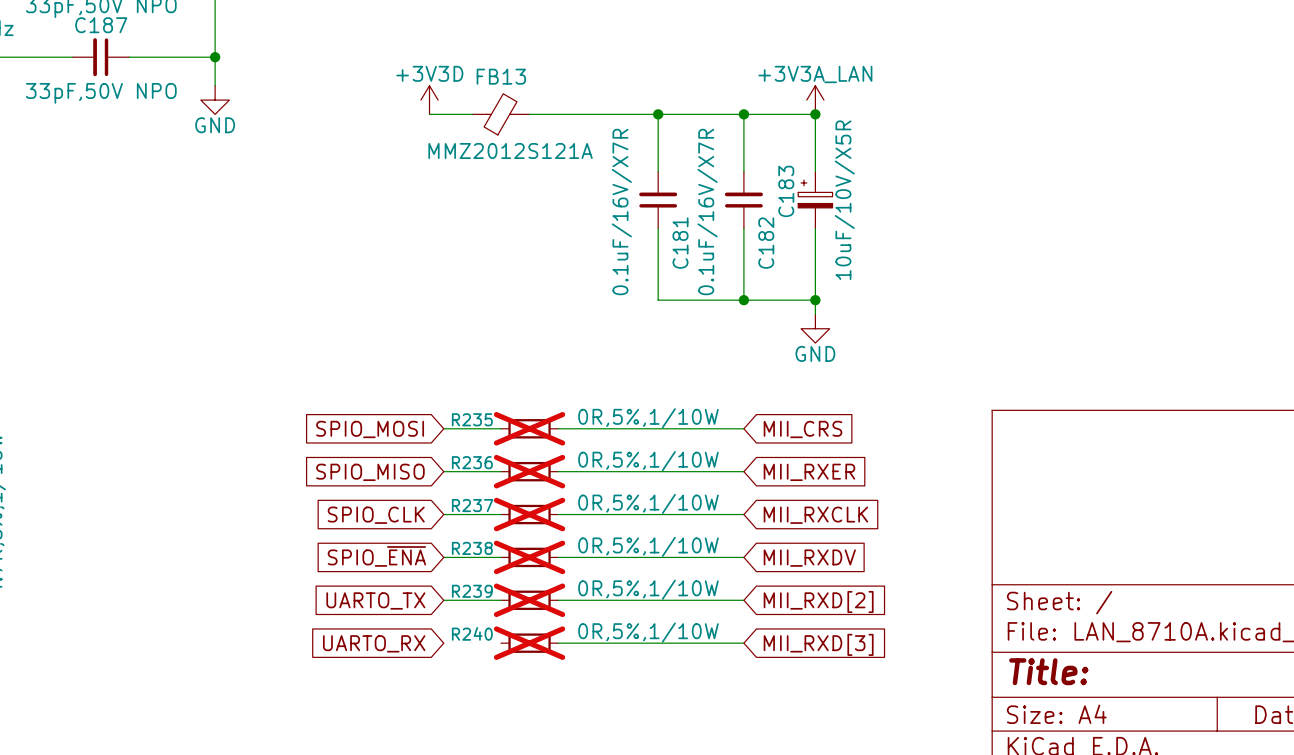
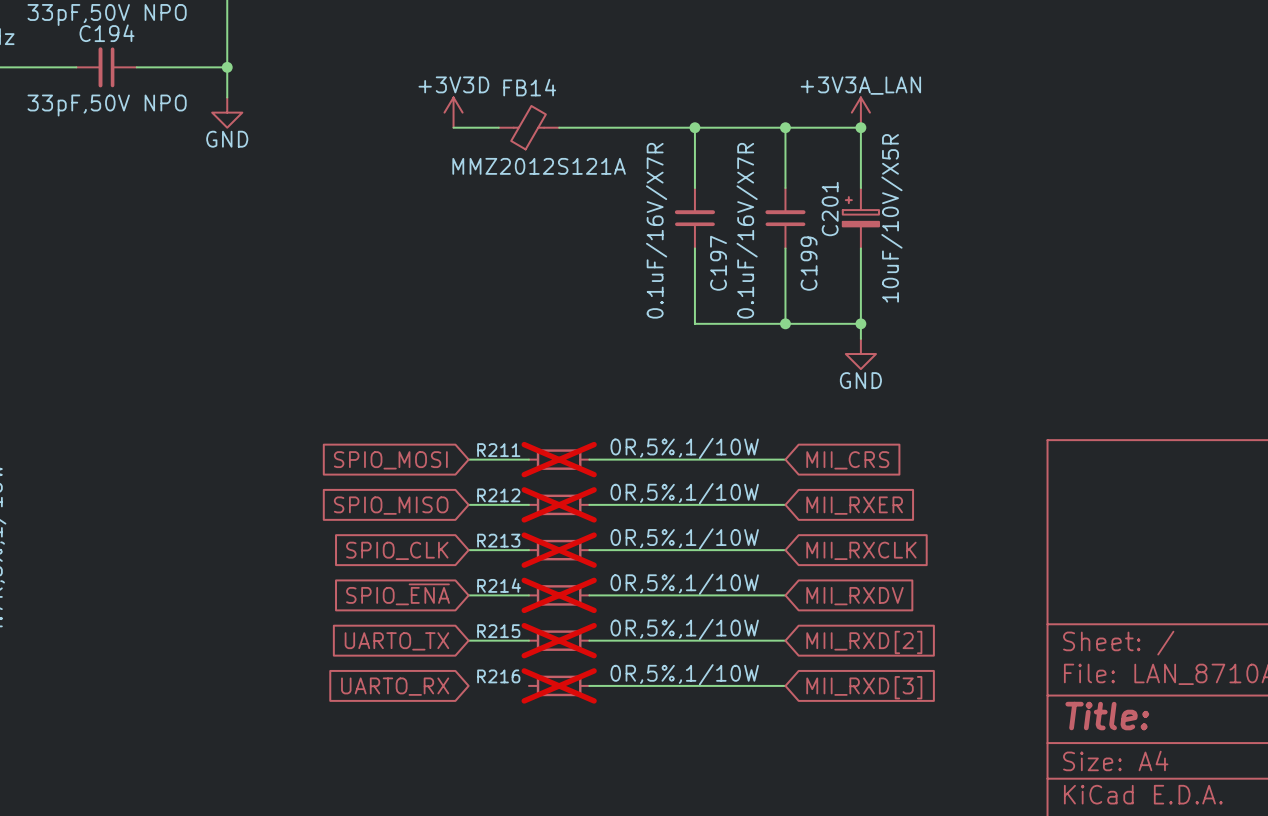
C187 name: C187 (101, 25) -> C194 (107, 33)
FB13 name: FB13 (501, 76) -> FB14 (529, 87)
C183 name: C183 (786, 191) -> C201 (830, 209)
C181 name: C181 (680, 243) -> C197 (718, 263)
C182 name: C182 (766, 243) -> C199 (809, 263)
R235 name: R235 (472, 419) -> R211 (498, 450)
R236 name: R236 (472, 462) -> R212 (498, 495)
R237 name: R237 (472, 505) -> R213 (498, 540)
R238 name: R238 (472, 548) -> R214 (499, 585)
R239 name: R239 (472, 591) -> R215 (498, 631)
R240 name: R240 (472, 633) -> R216 (498, 676)

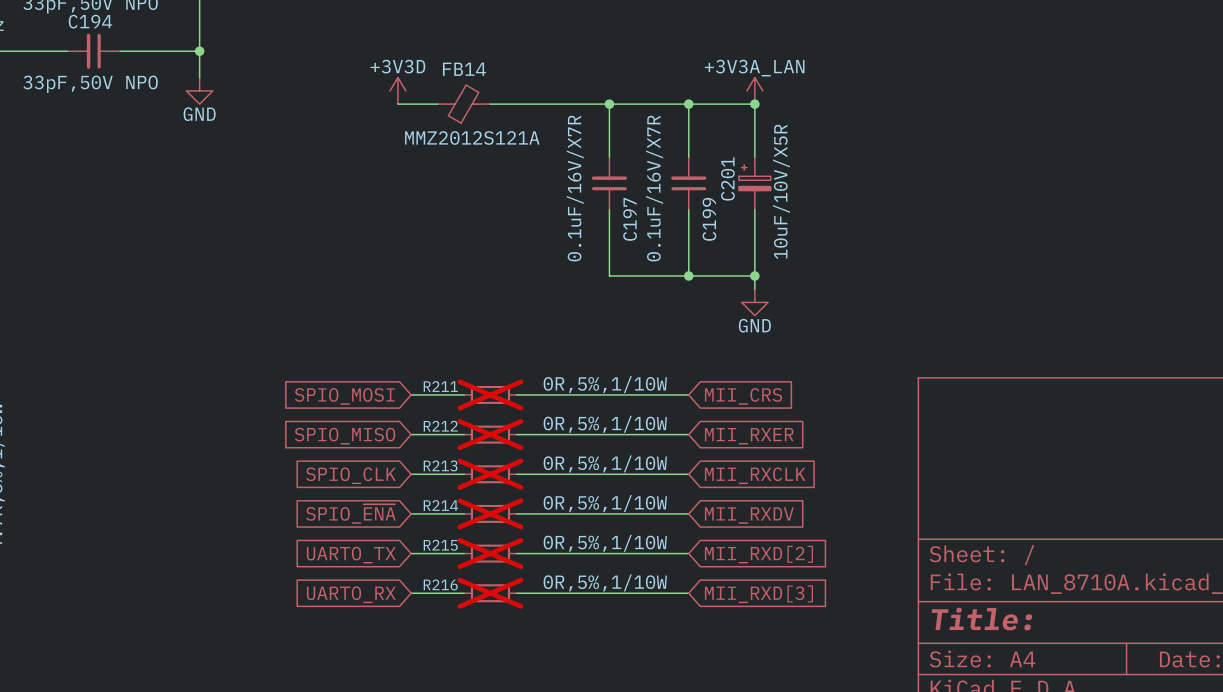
wire: none -> (411, 593) (464, 593)

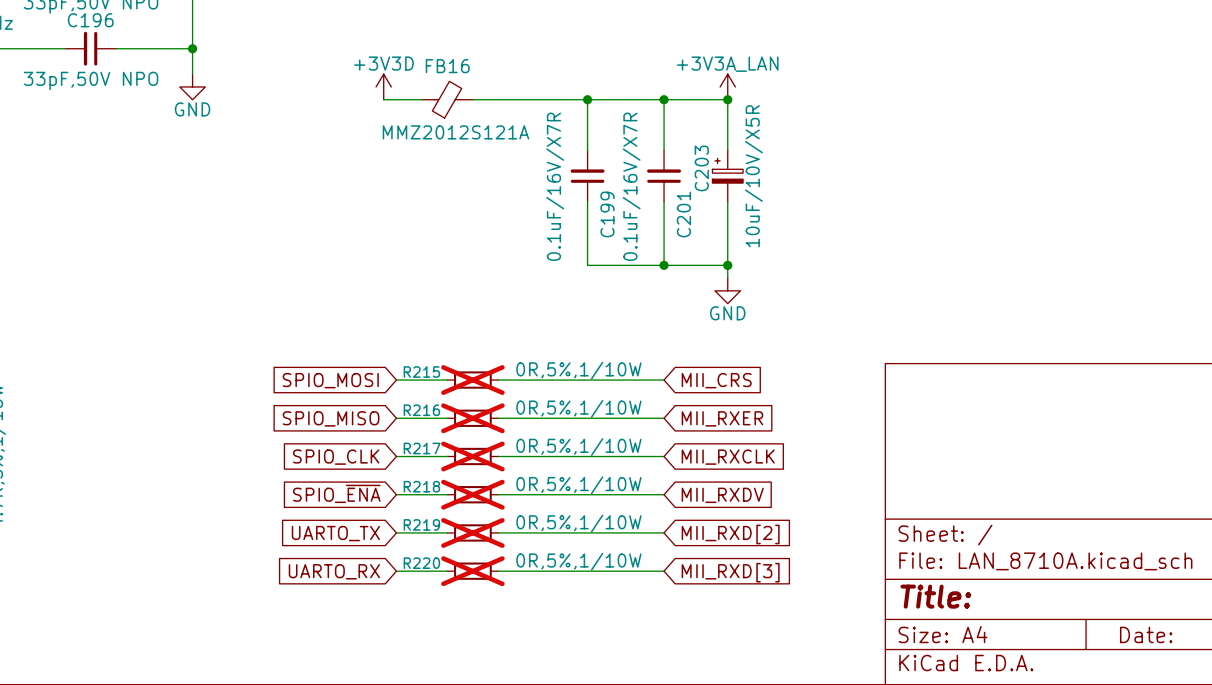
C194 name: C194 (90, 21) -> C196 (90, 20)
FB14 name: FB14 (464, 69) -> FB16 (447, 66)
C201 name: C201 (727, 178) -> C203 (701, 168)
C197 name: C197 (630, 219) -> C199 (607, 214)
C199 name: C199 (709, 219) -> C201 (683, 214)
R211 name: R211 (440, 386) -> R215 (421, 372)
R212 name: R212 (440, 426) -> R216 (421, 410)
R213 name: R213 (440, 465) -> R217 (422, 448)
R214 name: R214 (440, 505) -> R218 (421, 486)
R215 name: R215 (440, 545) -> R219 (421, 524)
R216 name: R216 (440, 584) -> R220 (421, 563)

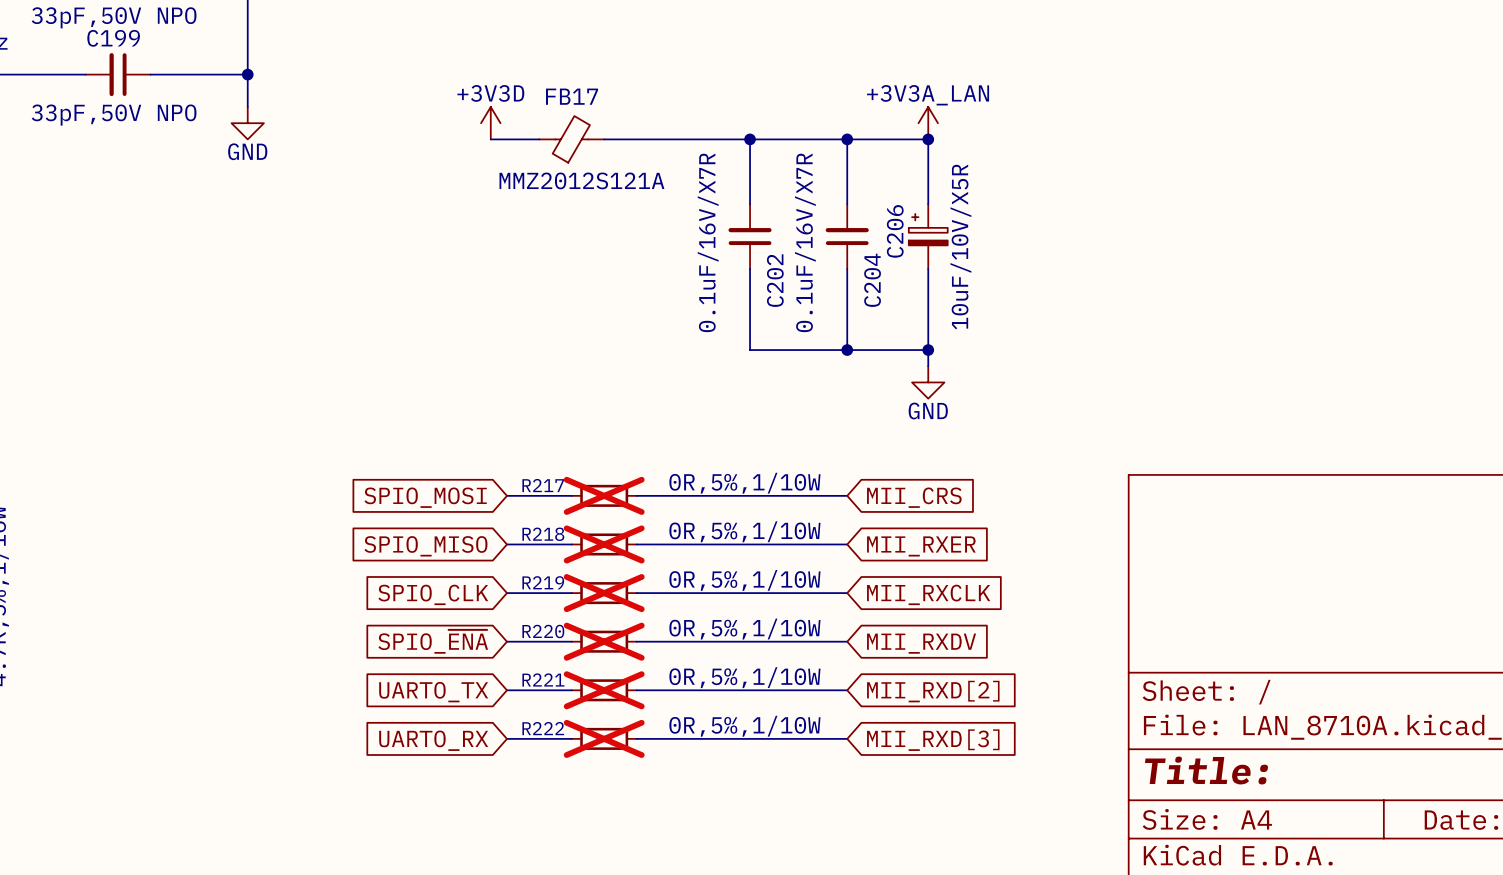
C196 name: C196 (90, 20) -> C199 (113, 38)
FB16 name: FB16 (447, 66) -> FB17 (572, 96)
C203 name: C203 (701, 168) -> C206 (895, 231)
C199 name: C199 (607, 214) -> C202 (775, 280)
C201 name: C201 (683, 214) -> C204 (872, 280)
R215 name: R215 (421, 372) -> R217 (543, 485)
R216 name: R216 (421, 410) -> R218 (543, 534)
R217 name: R217 (422, 448) -> R219 (543, 582)
R218 name: R218 (421, 486) -> R220 (543, 631)
R219 name: R219 (421, 524) -> R221 (543, 679)
R220 name: R220 (421, 563) -> R222 (543, 728)

